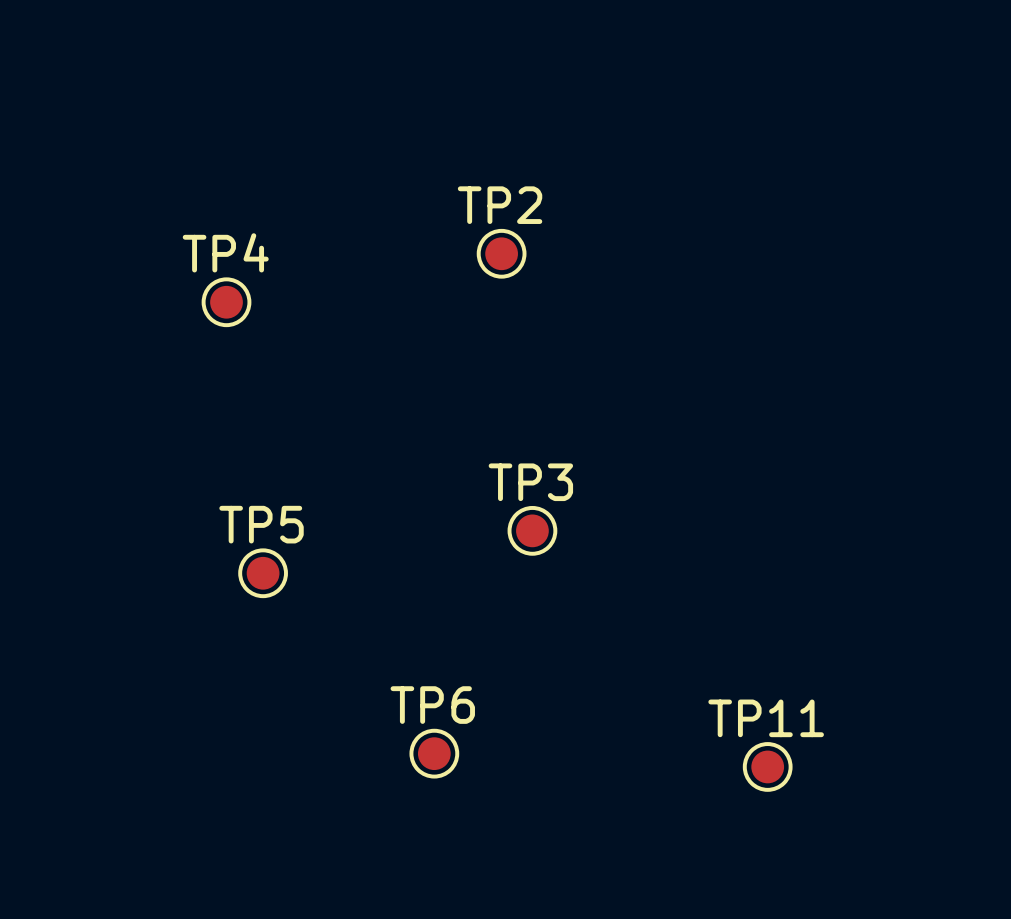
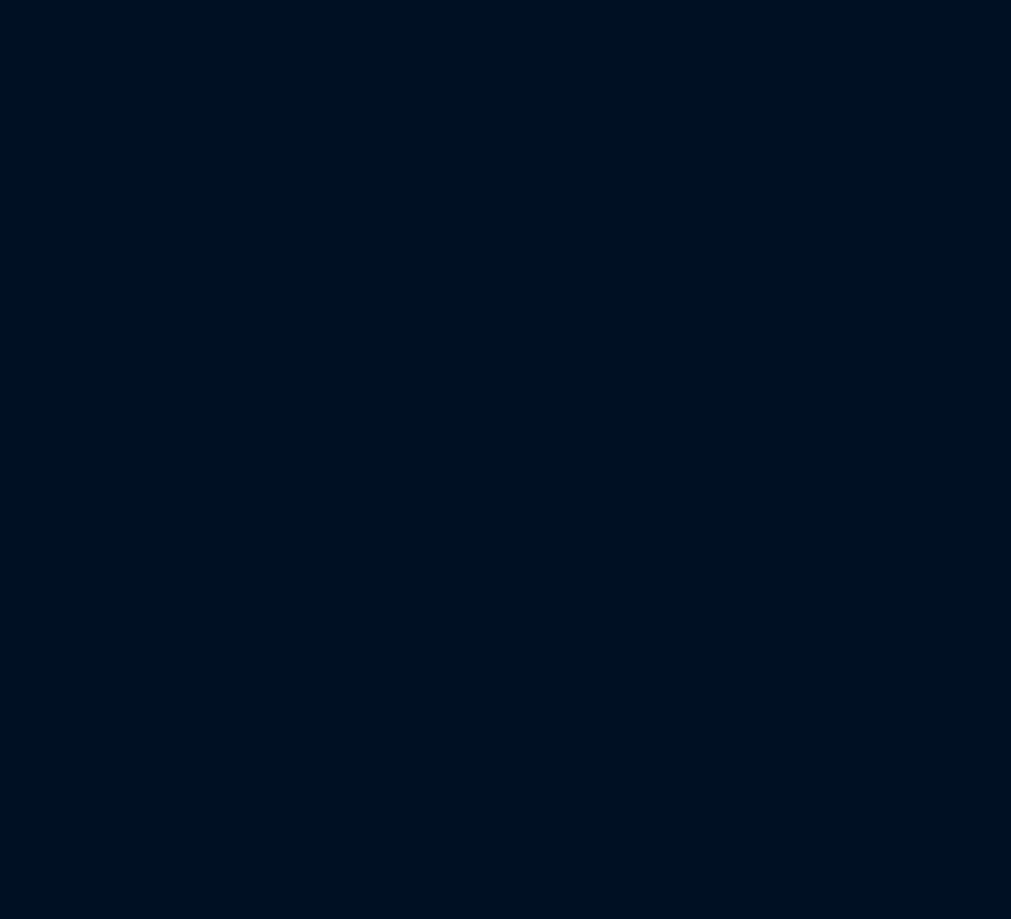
TP2: (501, 253) -> none
TP4: (226, 302) -> none
TP3: (532, 530) -> none
TP5: (263, 573) -> none
TP6: (434, 753) -> none
TP11: (767, 766) -> none

